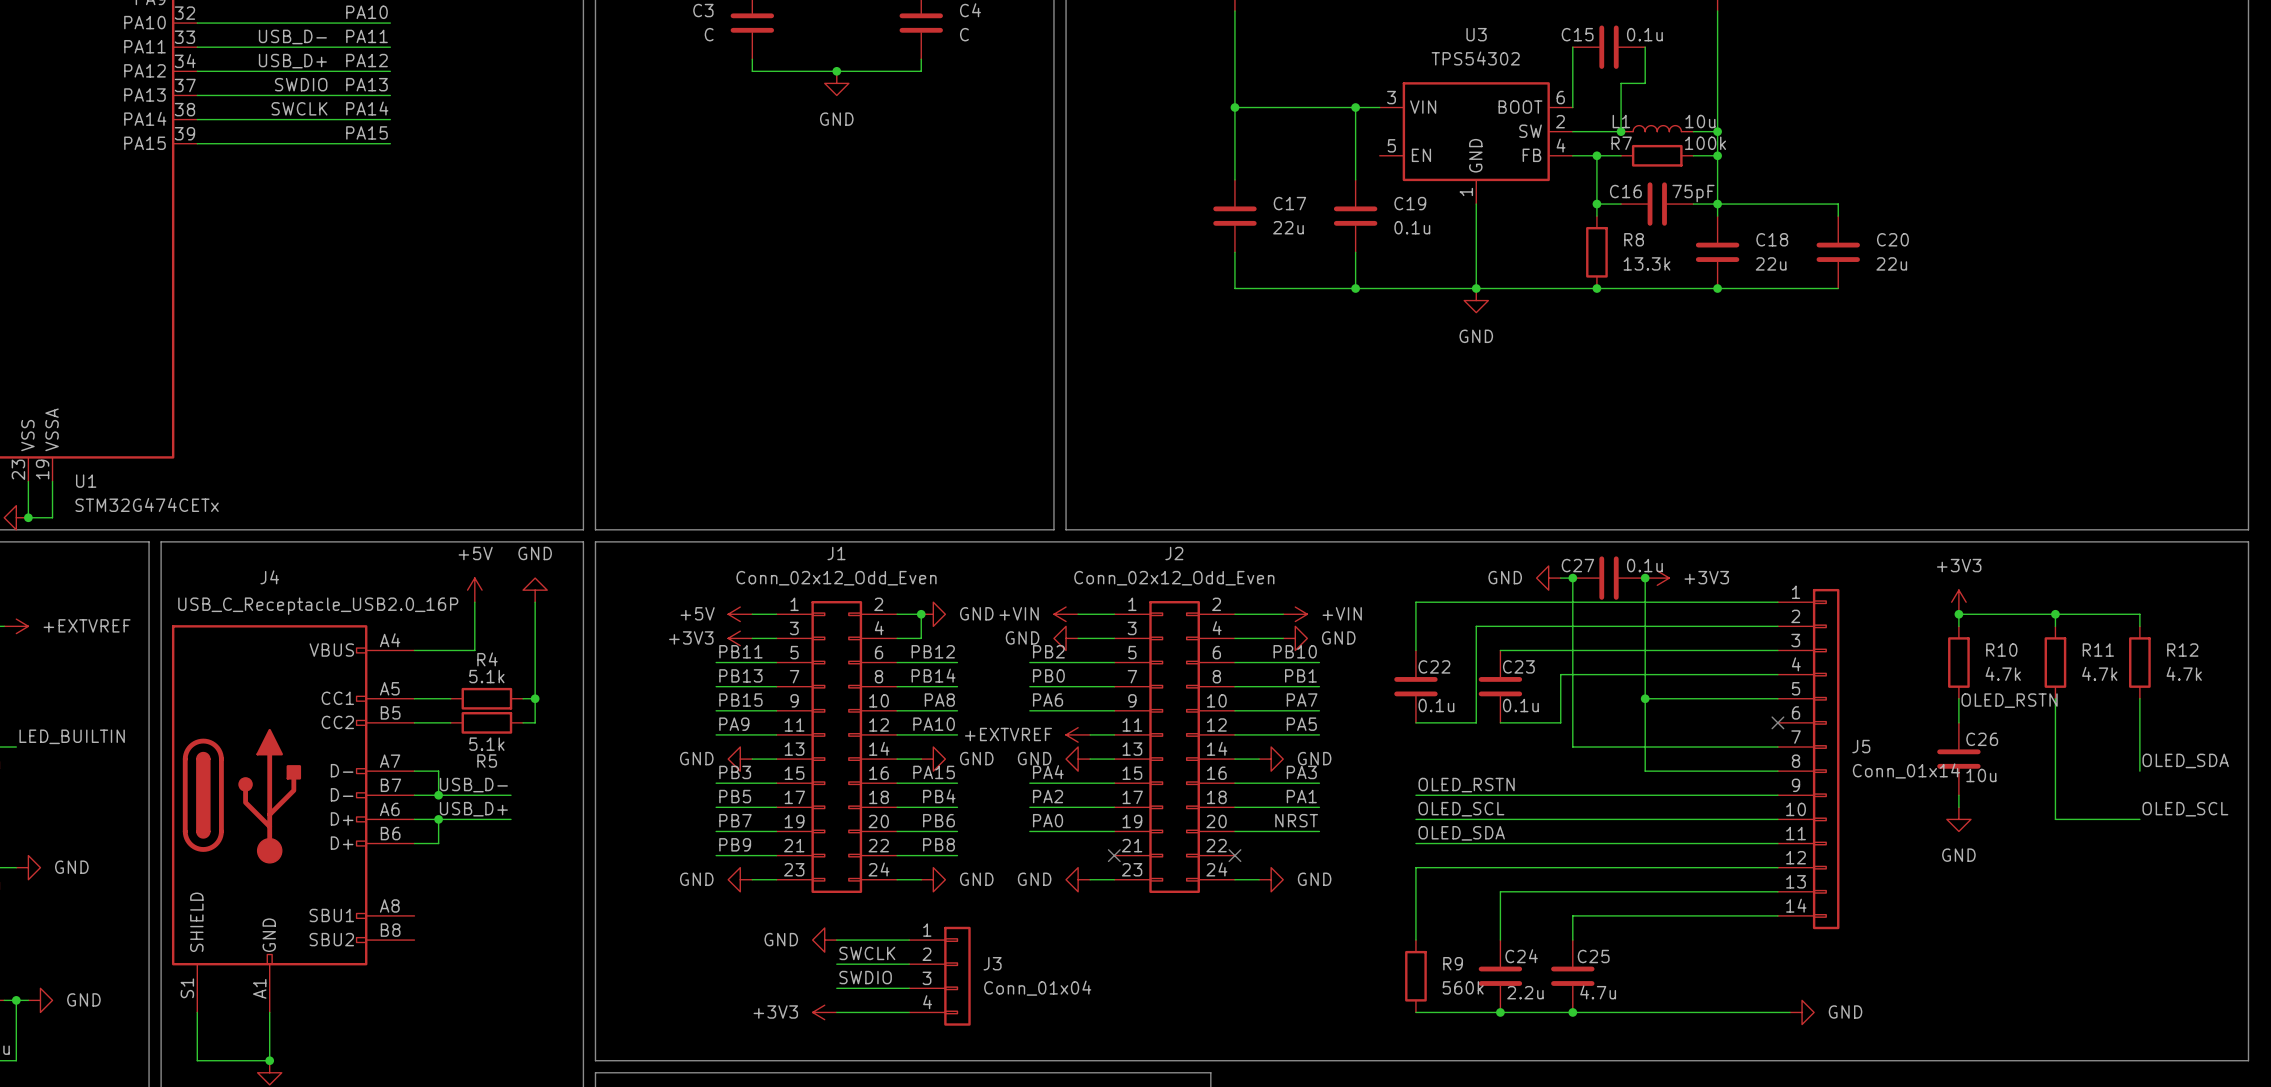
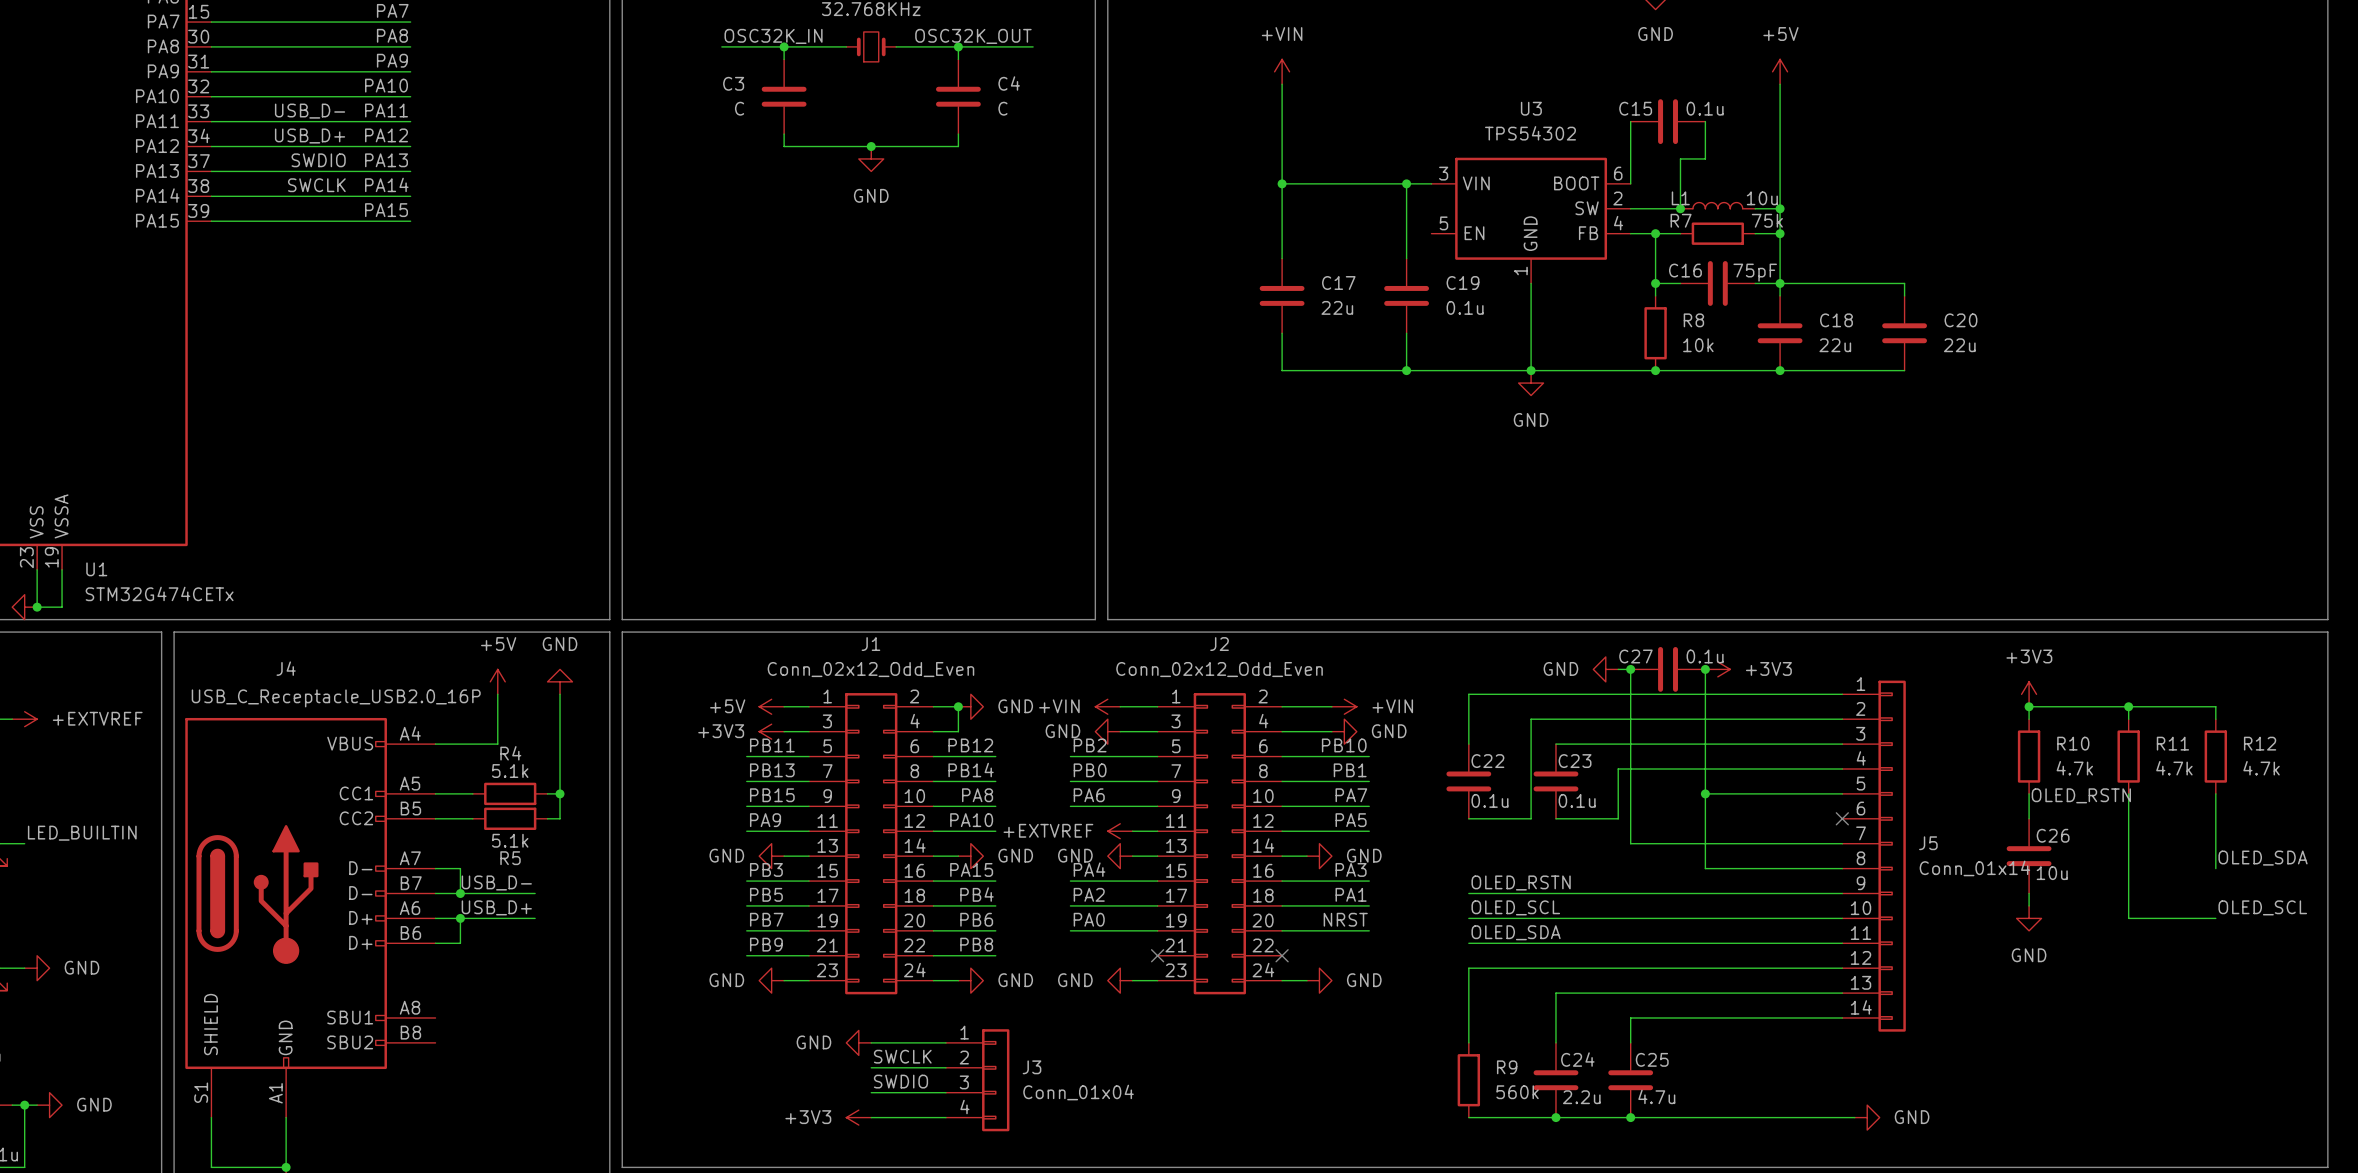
R7 value: 100k (1705, 143) -> 75k (1767, 220)
R8 value: 13.3k (1647, 263) -> 10k (1698, 345)

